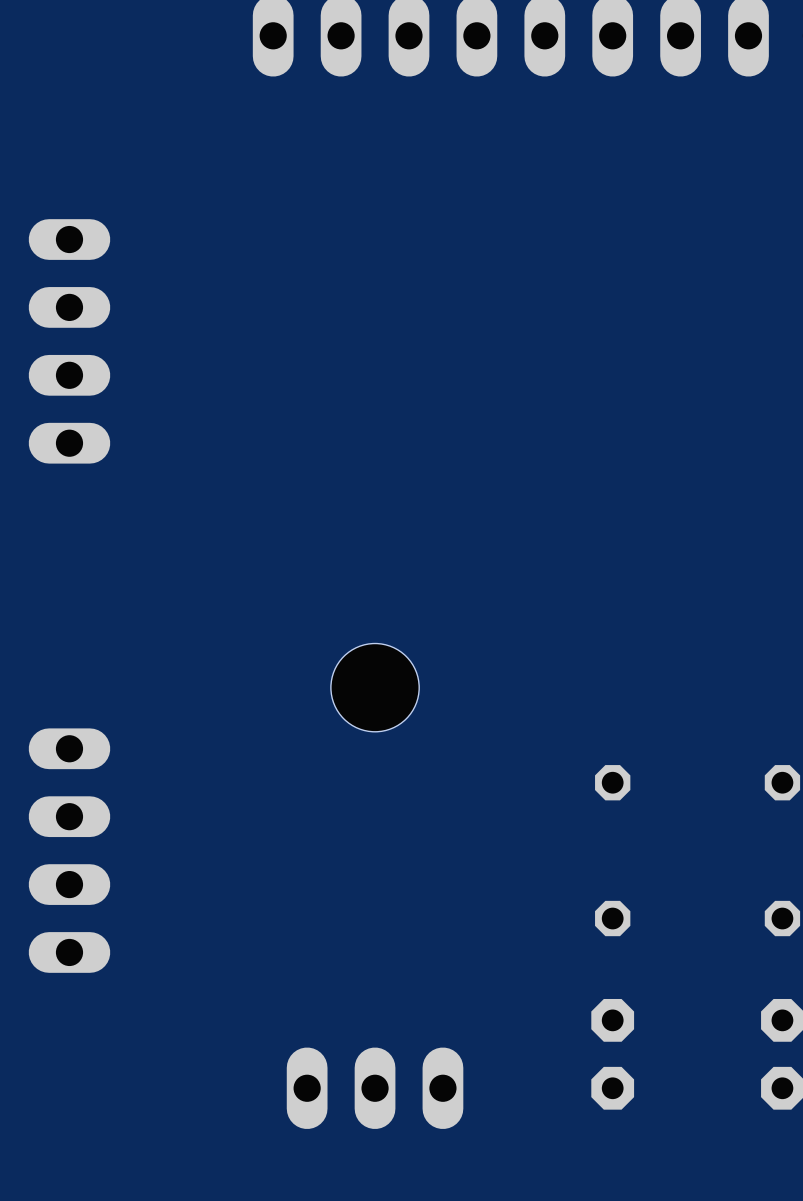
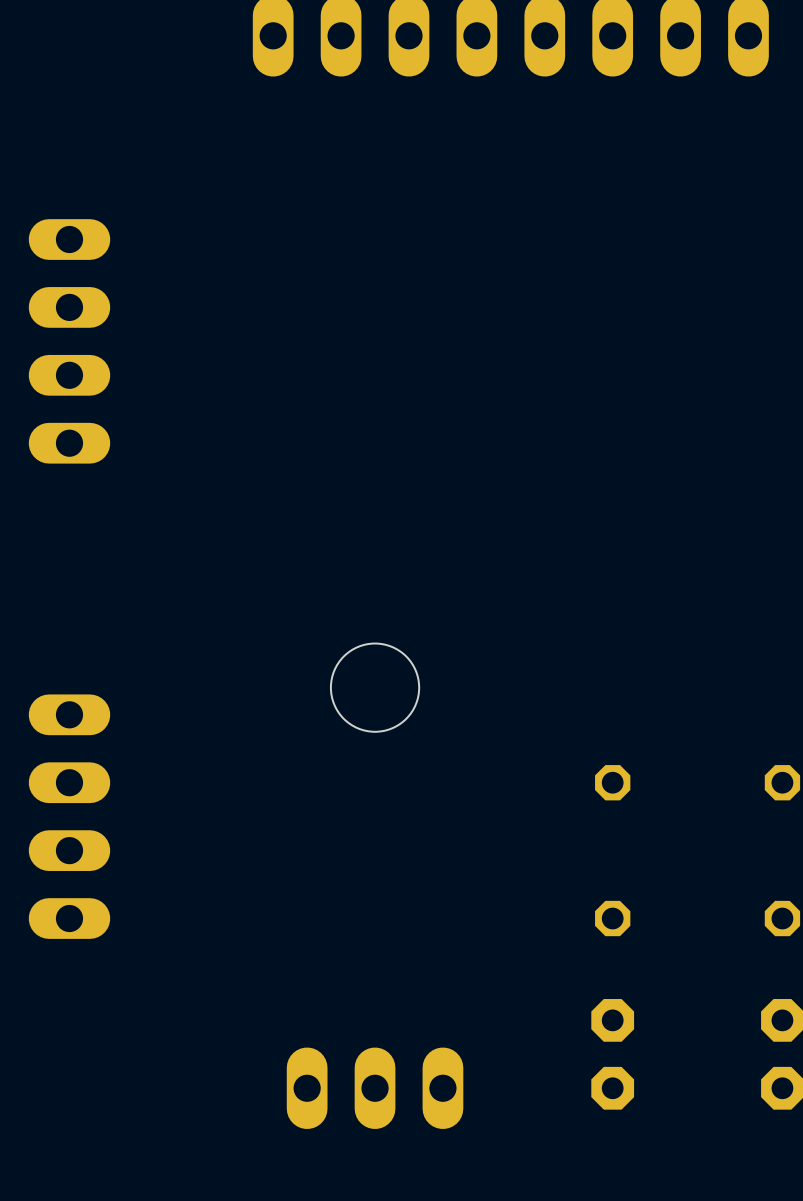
part position: (69, 850) -> (69, 816)

